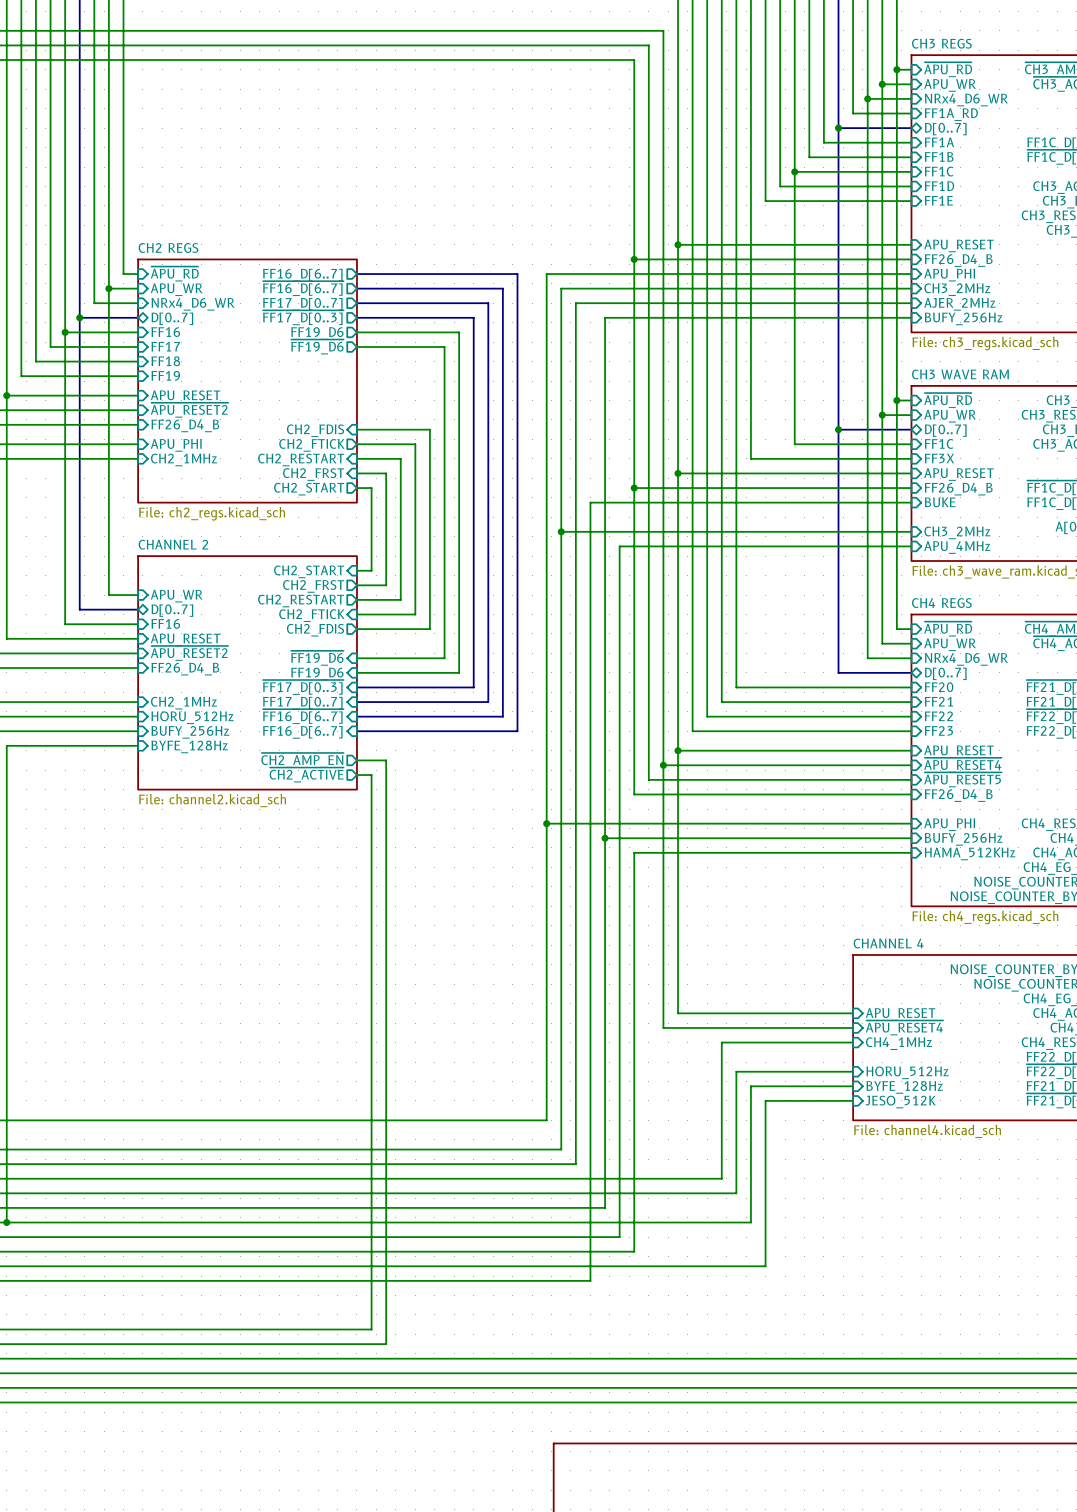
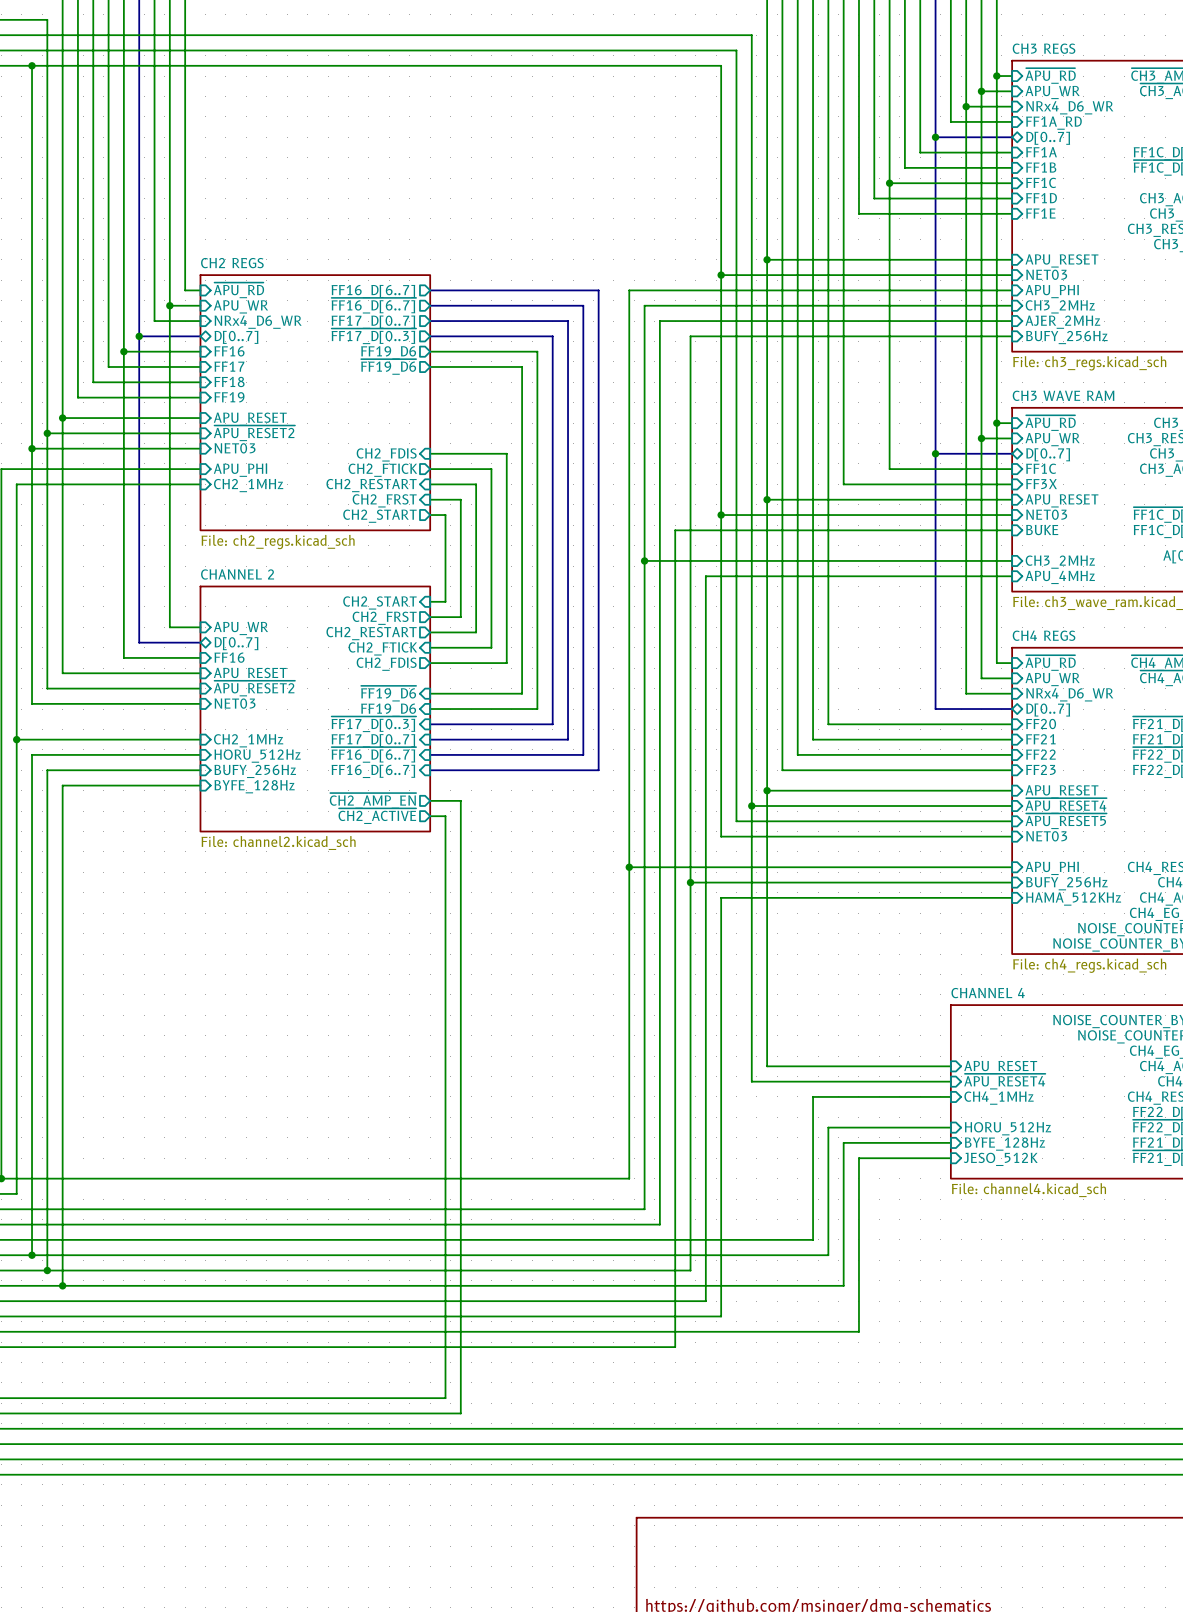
sheet pin: FF26_D4_B (958, 260) -> NET03 (1046, 274)
sheet pin: FF26_D4_B (185, 425) -> NET03 (235, 448)
sheet pin: FF26_D4_B (958, 489) -> NET03 (1046, 514)
sheet pin: FF26_D4_B (185, 669) -> NET03 (235, 703)
sheet pin: FF26_D4_B (958, 795) -> NET03 (1046, 836)

